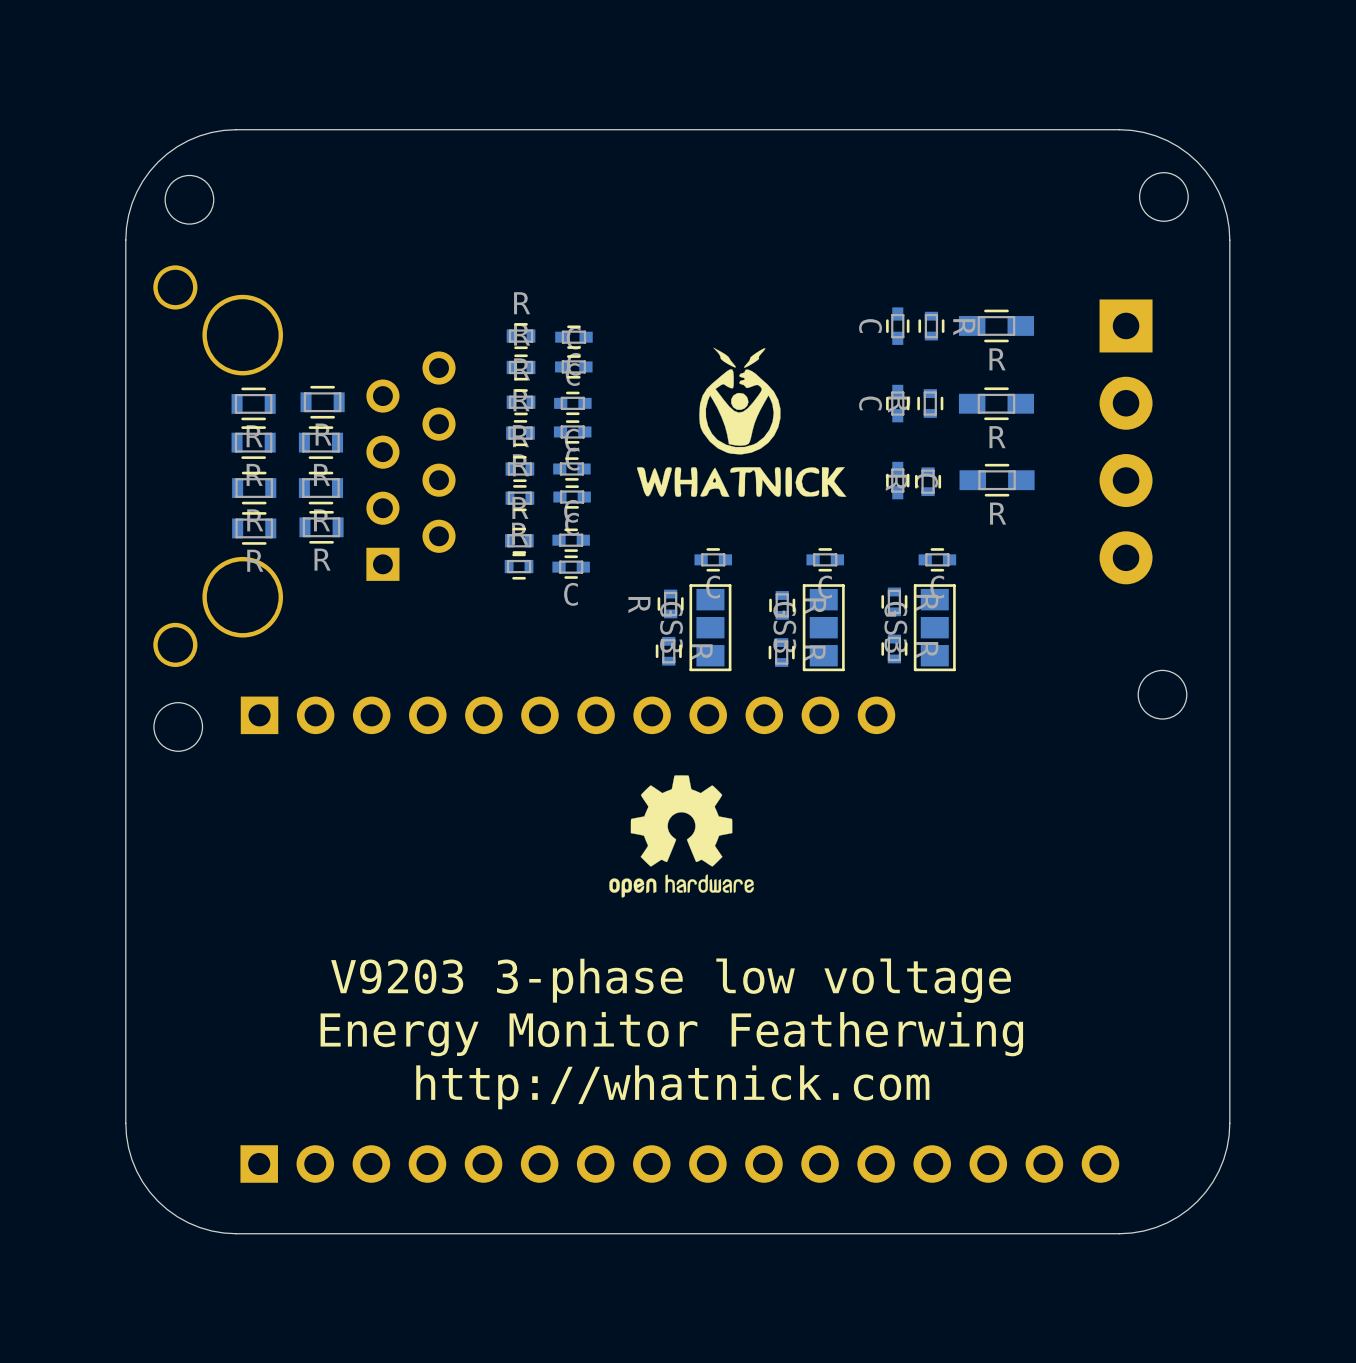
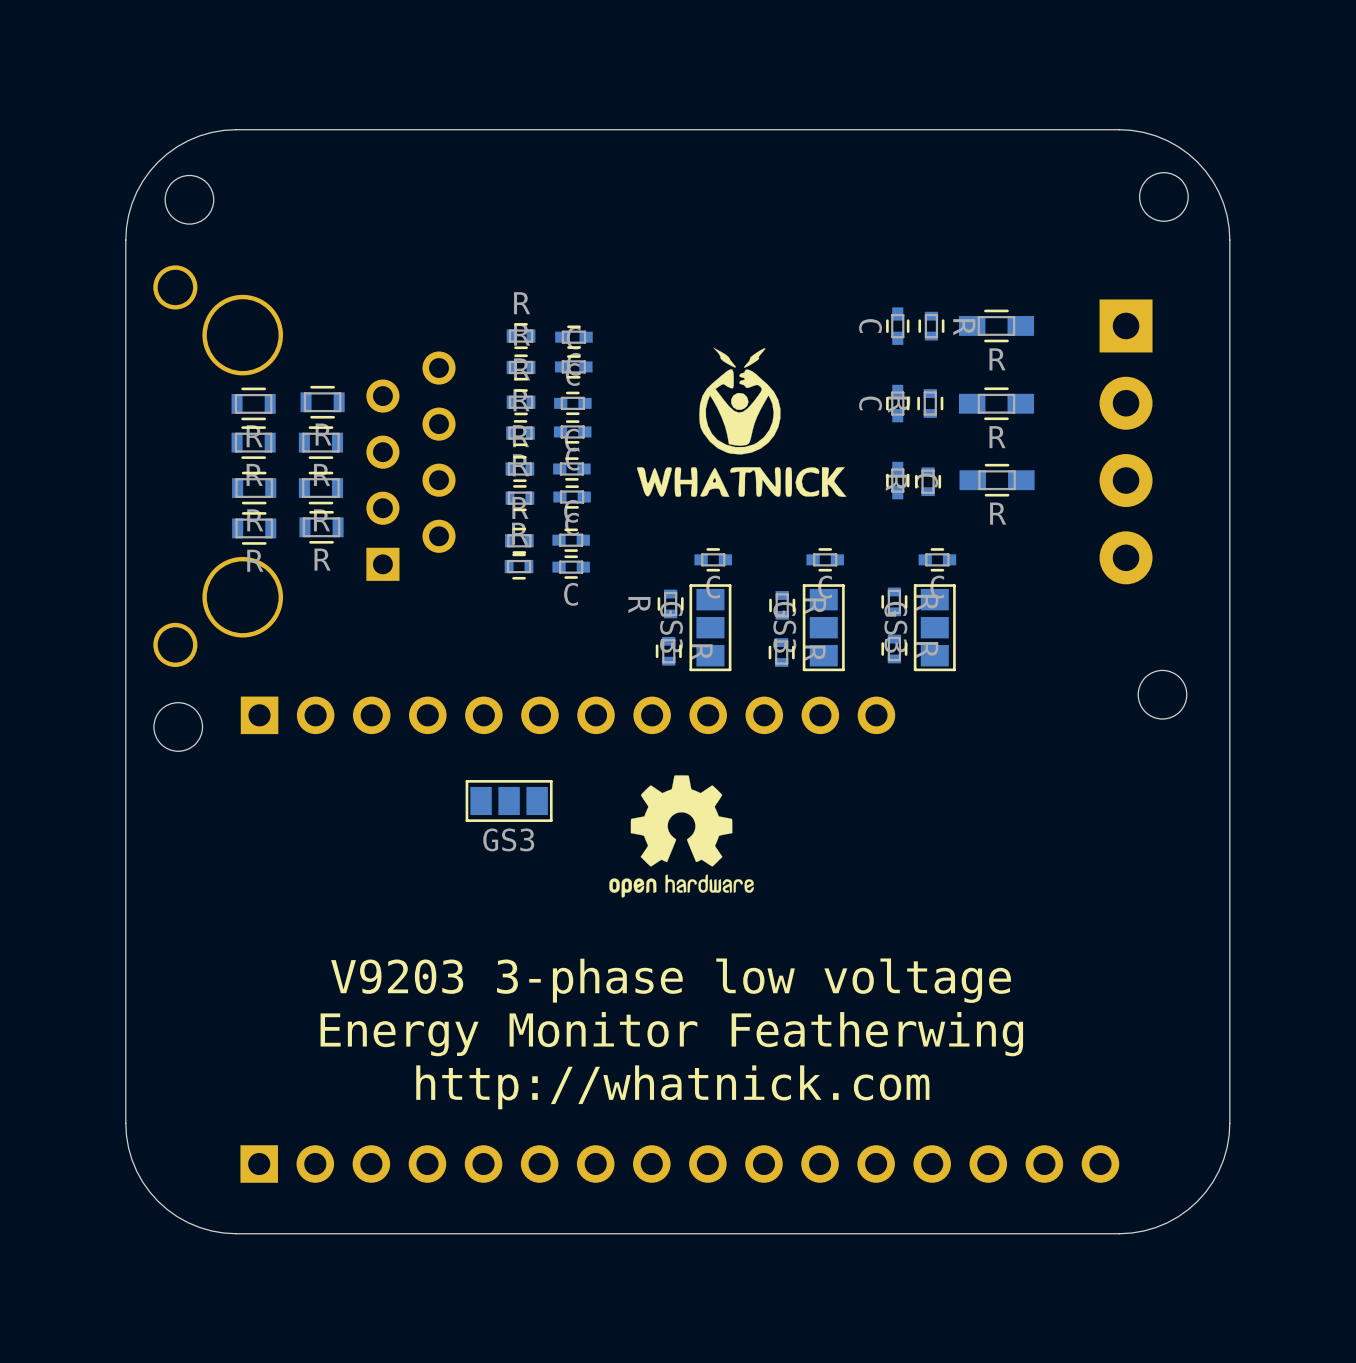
part: none -> GS3 (509, 801)

